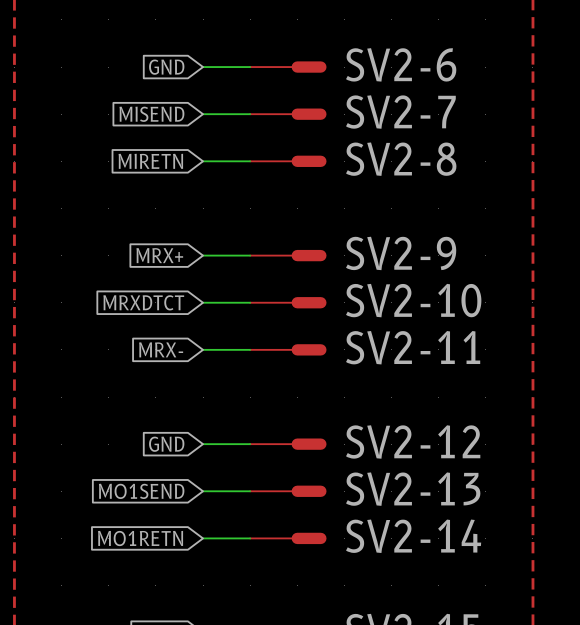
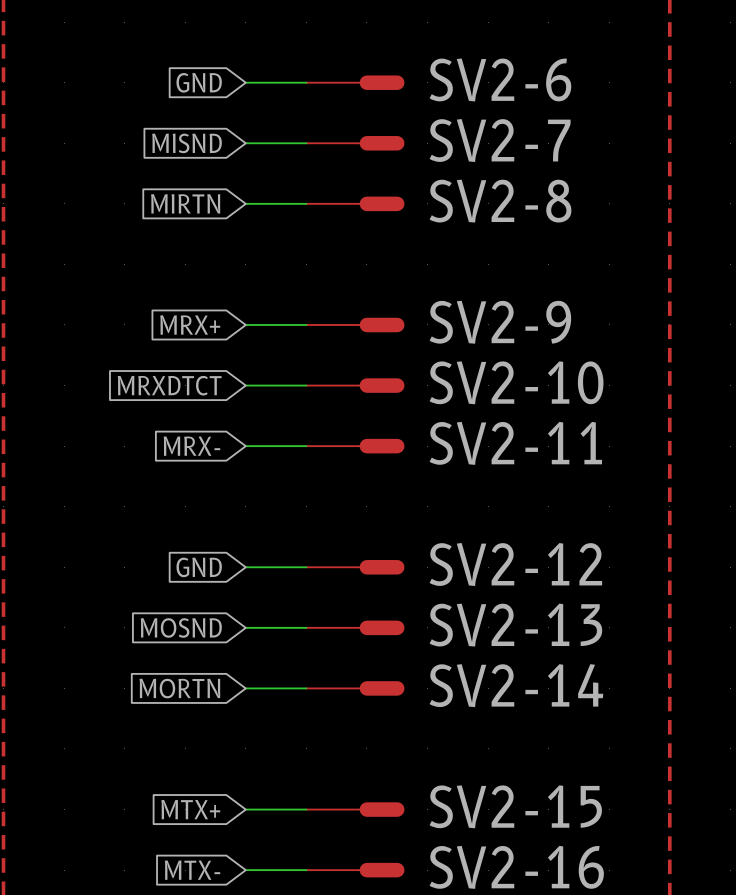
global label: MISEND (151, 114) -> MISND (187, 143)
global label: MIRETN (150, 161) -> MIRTN (185, 203)
global label: MO1SEND (141, 491) -> MOSND (181, 627)
global label: MO1RETN (140, 538) -> MORTN (179, 688)

